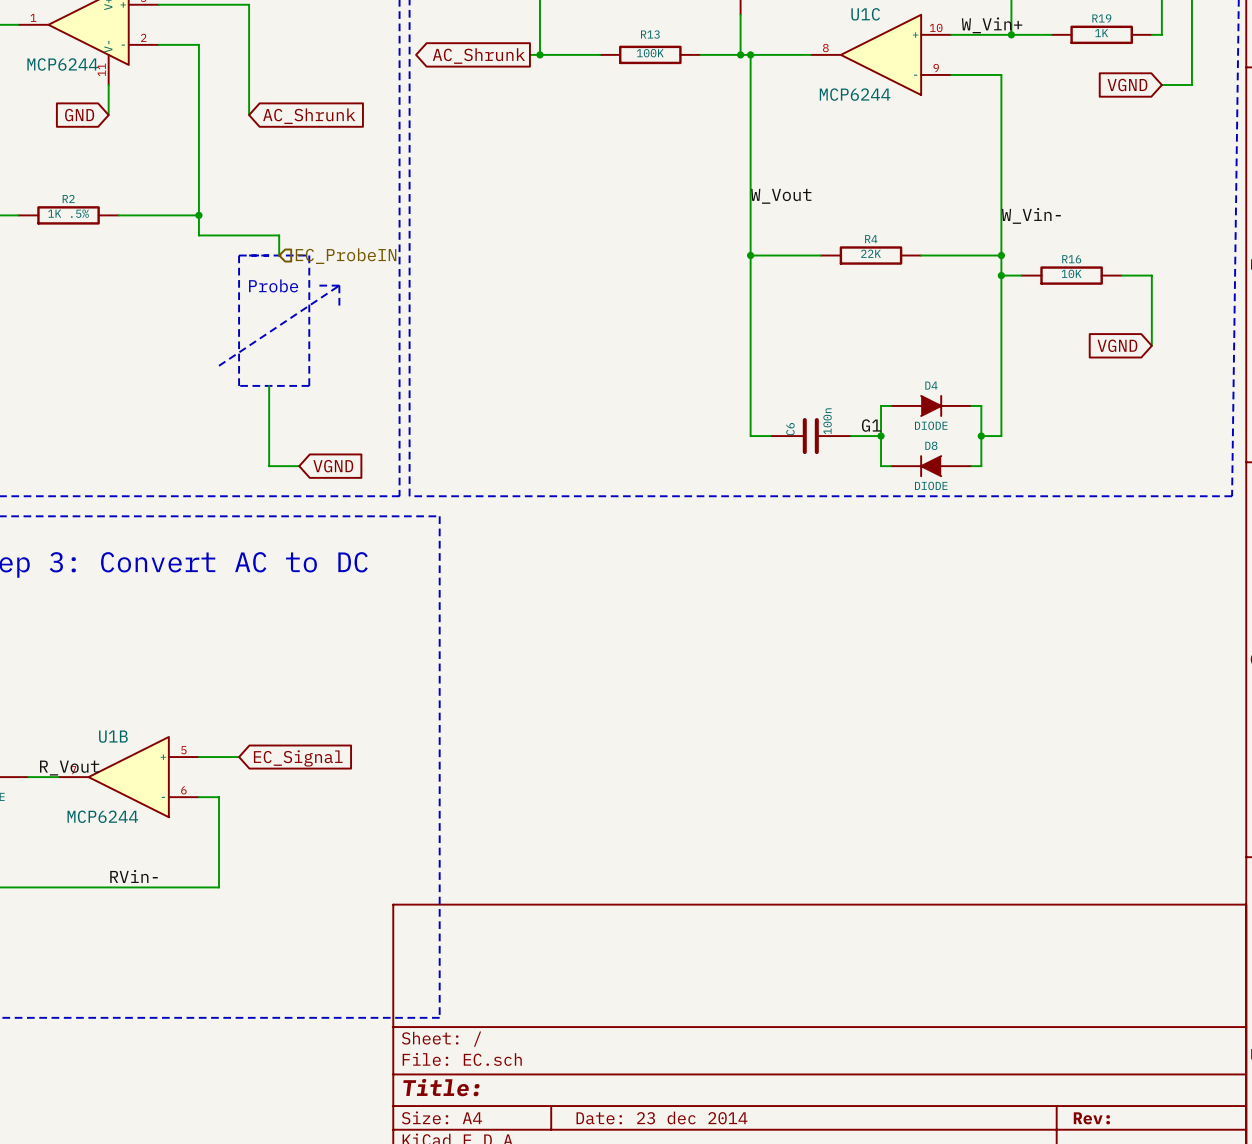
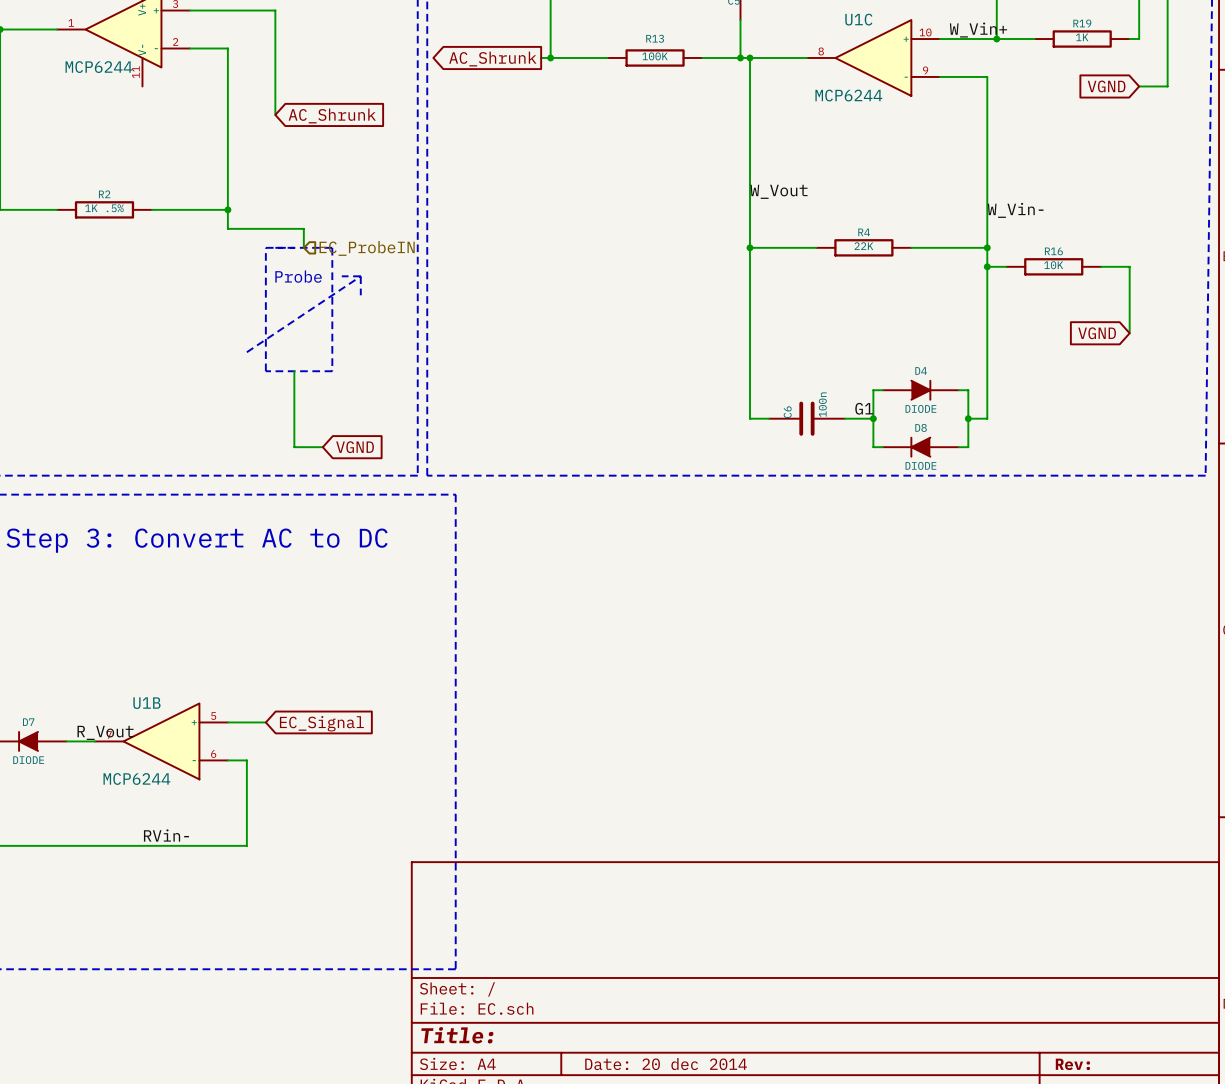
wire: (108, 84) (108, 115) -> none
global label: GND (79, 115) -> none
title block: Date: 23 dec 2014 (661, 1117) -> Date: 20 dec 2014 (666, 1064)

